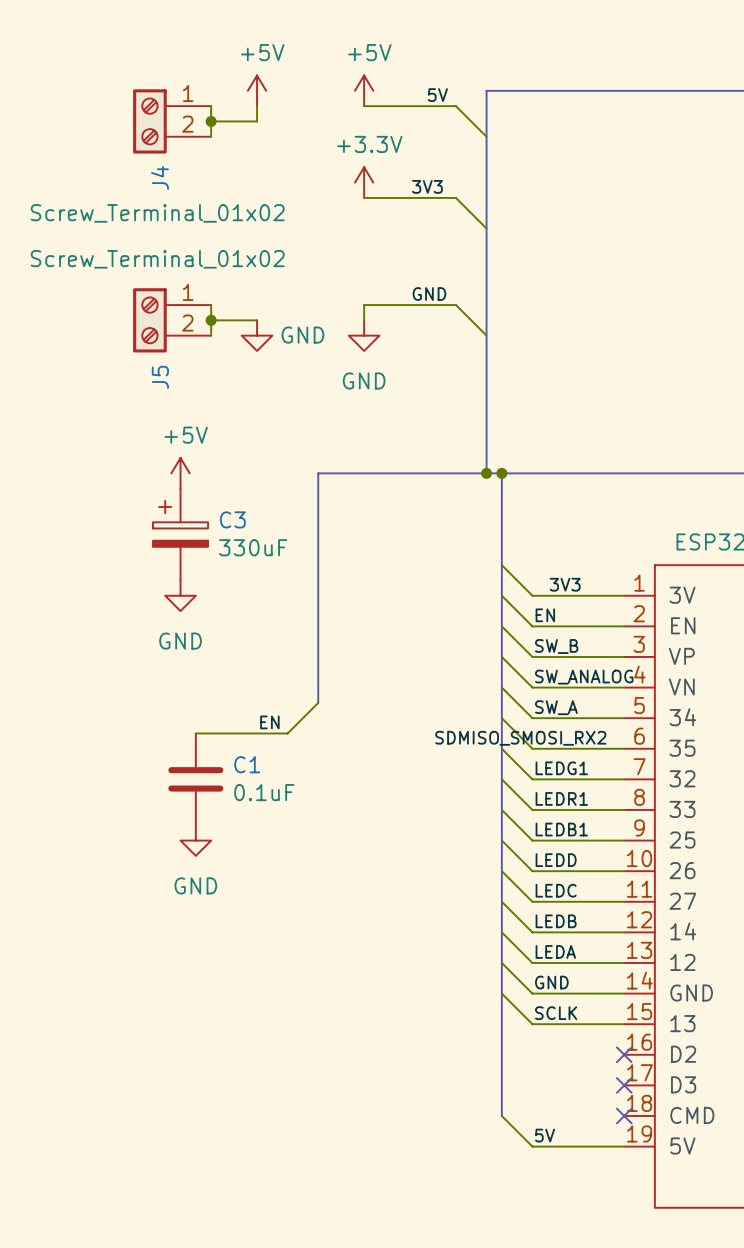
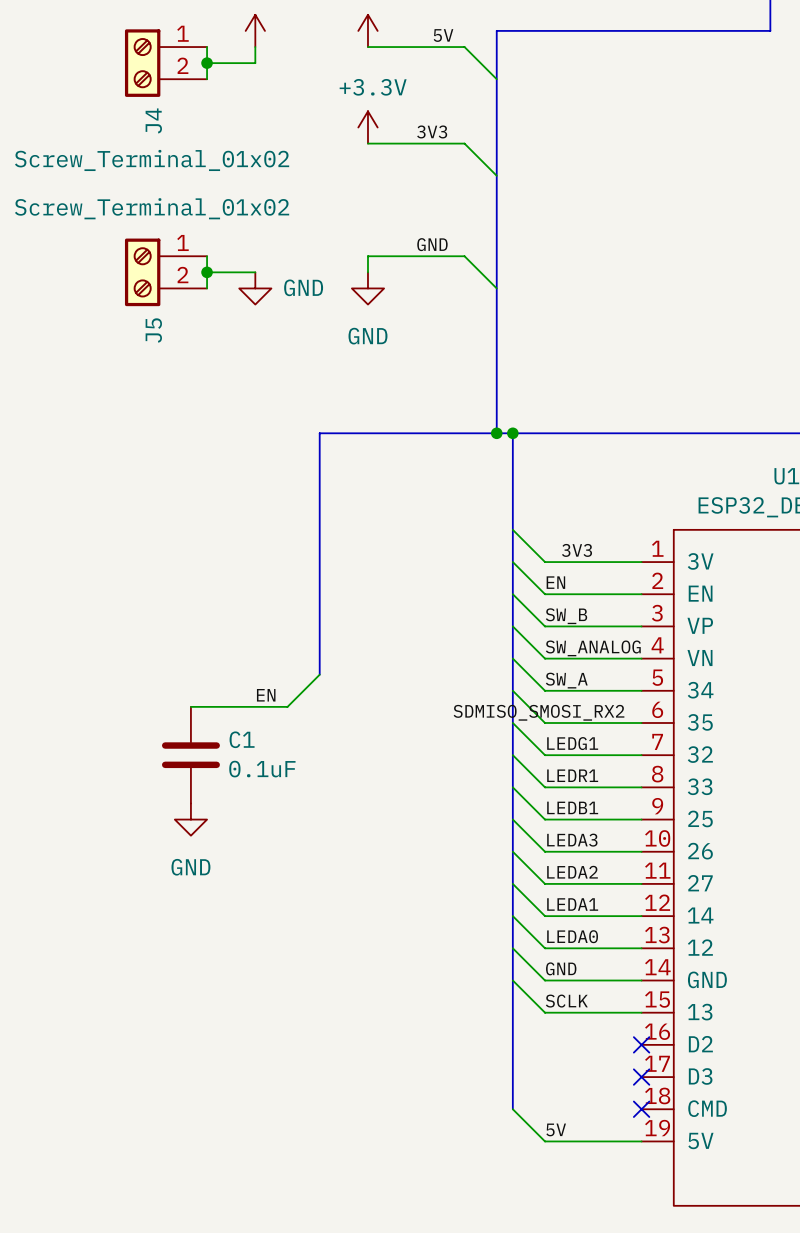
power symbol: +5V (180, 473) -> none
C3: 330uF (180, 534) -> none
power symbol: GND (180, 595) -> none
label: LEDD (556, 860) -> LEDA3 (572, 840)
label: LEDC (556, 890) -> LEDA2 (572, 872)
label: LEDB (556, 921) -> LEDA1 (572, 904)
label: LEDA (555, 951) -> LEDA0 (572, 936)

